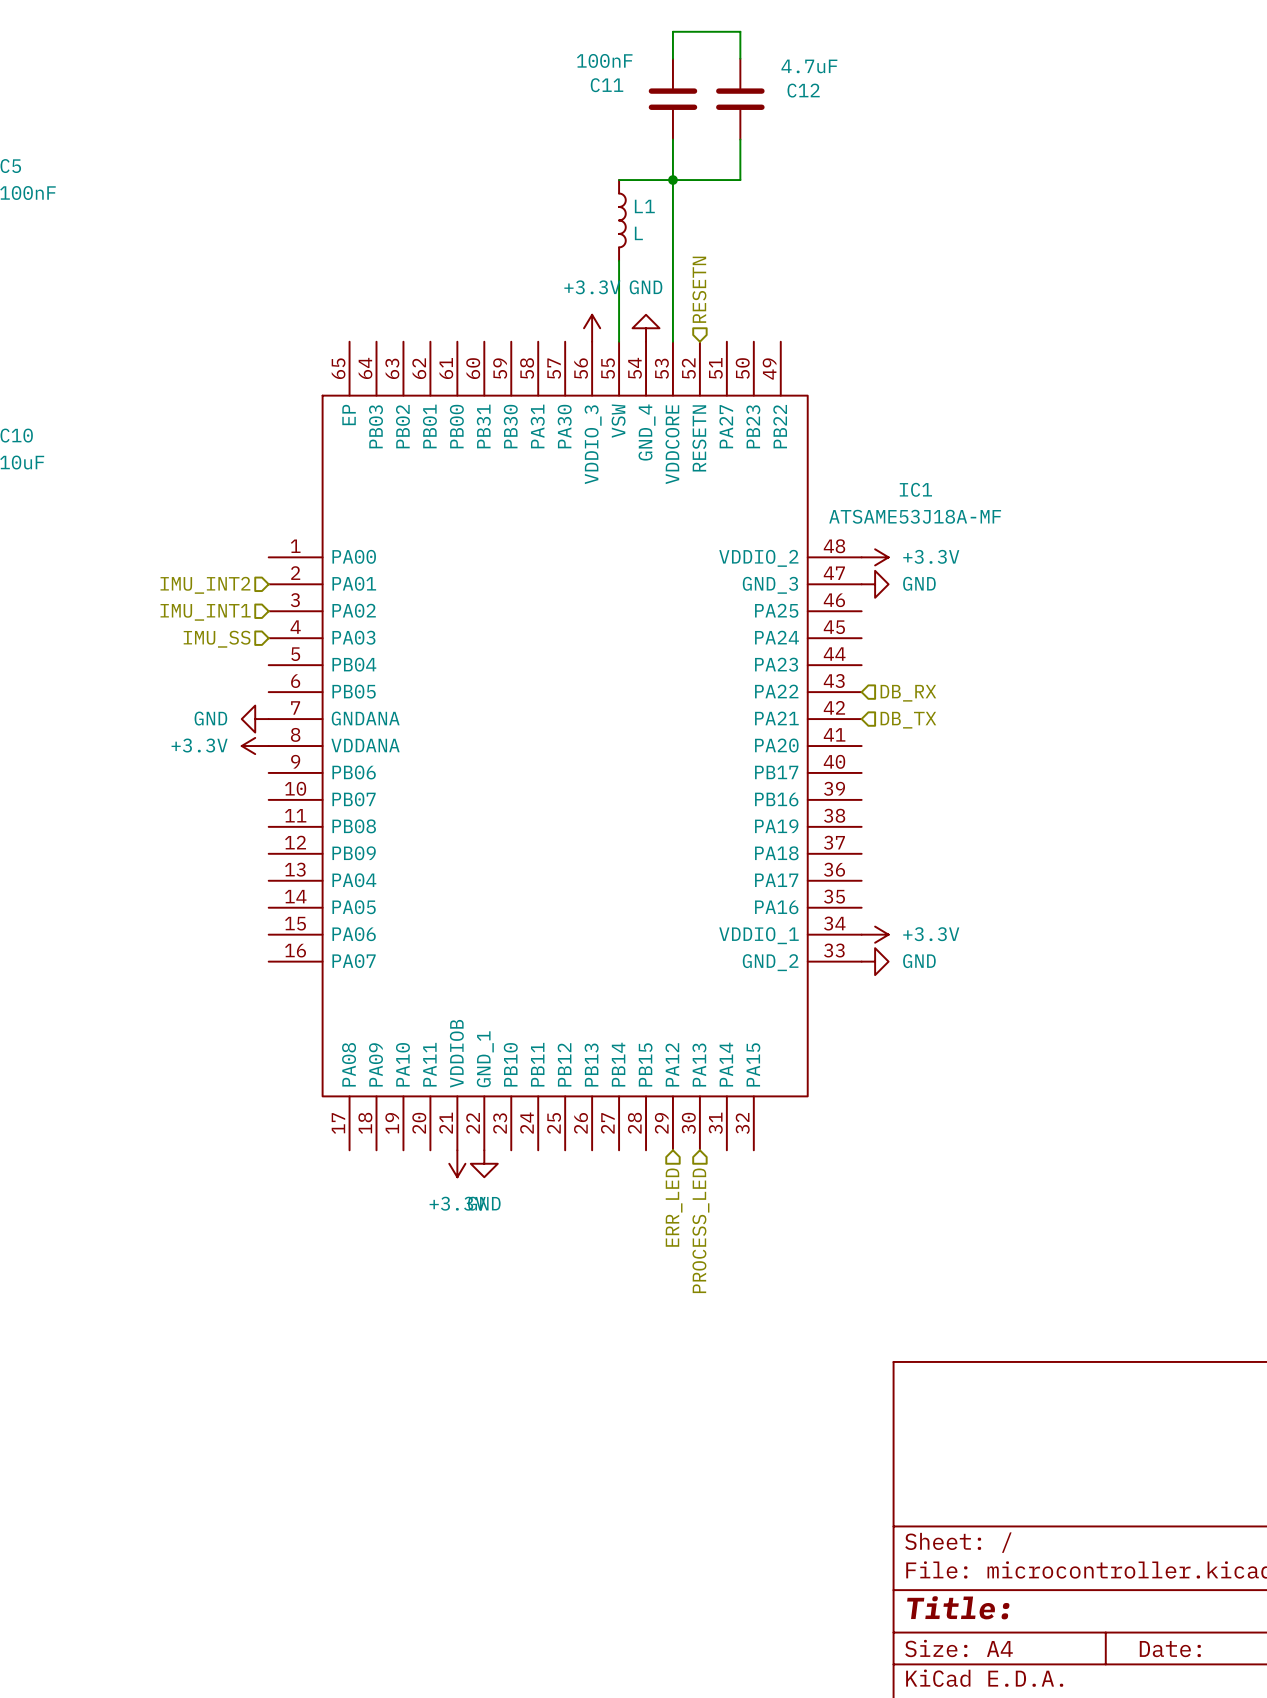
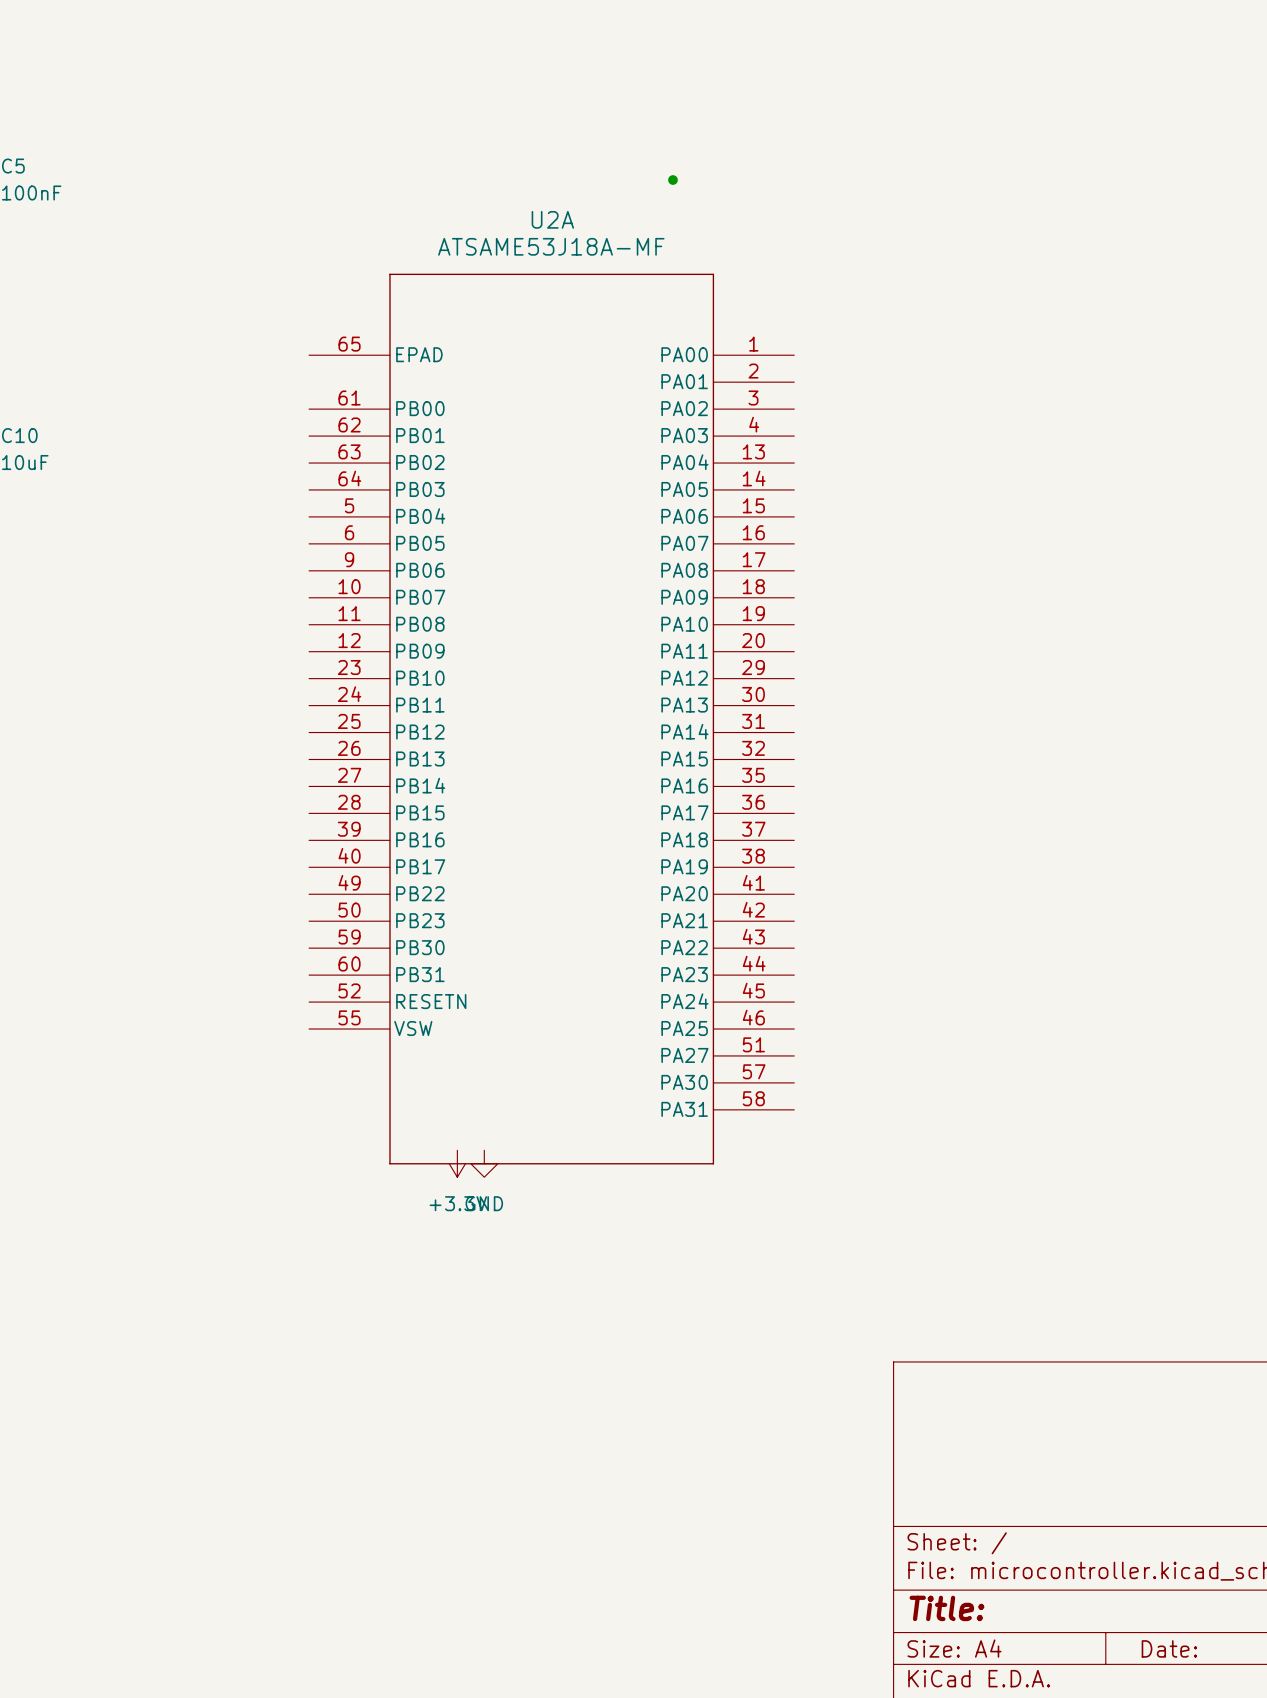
wire: (672, 58) (672, 31) (740, 31) (740, 58) -> none
C11: 100nF (672, 99) -> none
C12: 4.7uF (740, 99) -> none
wire: (672, 139) (672, 341) -> none
wire: (740, 139) (740, 180) (619, 180) -> none
L1: L (622, 220) -> none
wire: (619, 260) (619, 341) -> none
hierarchical label: RESETN (699, 289) -> none
power symbol: +3.3V (592, 328) -> none
power symbol: GND (646, 328) -> none
power symbol: +3.3V (875, 557) -> none
power symbol: GND (875, 584) -> none
hierarchical label: IMU_INT2 (205, 585) -> none
hierarchical label: IMU_INT1 (205, 612) -> none
hierarchical label: IMU_SS (217, 639) -> none
hierarchical label: DB_RX (908, 693) -> none
power symbol: GND (255, 719) -> none
U2A: none -> ATSAME53J18A-MF (551, 719)
hierarchical label: DB_TX (908, 720) -> none
power symbol: +3.3V (255, 746) -> none
IC1: ATSAME53J18A-MF (565, 746) -> none
power symbol: +3.3V (875, 934) -> none
power symbol: GND (875, 961) -> none
hierarchical label: ERR_LED (674, 1207) -> none
hierarchical label: PROCESS_LED (700, 1230) -> none

